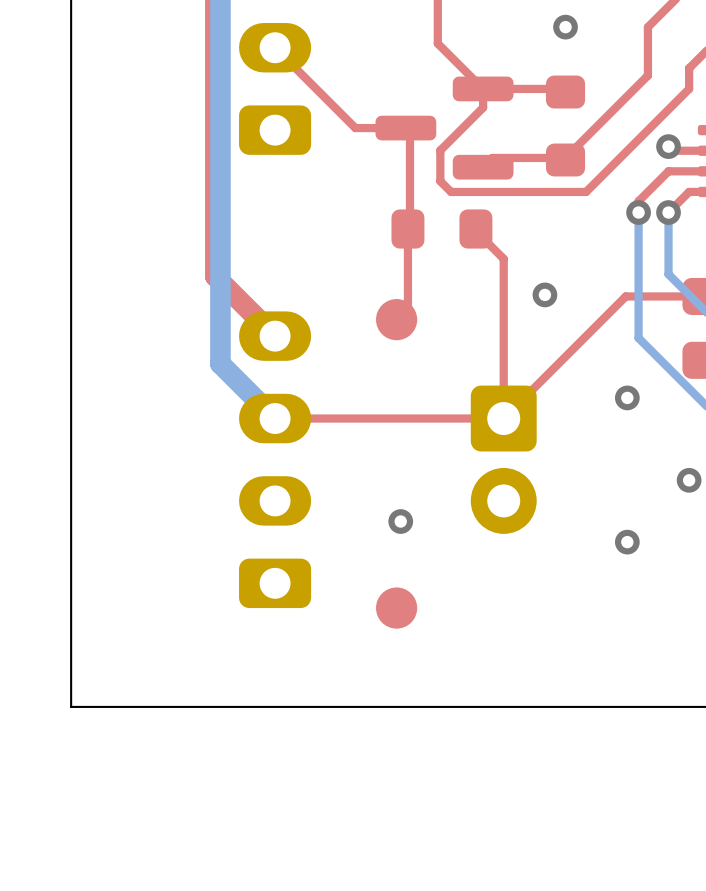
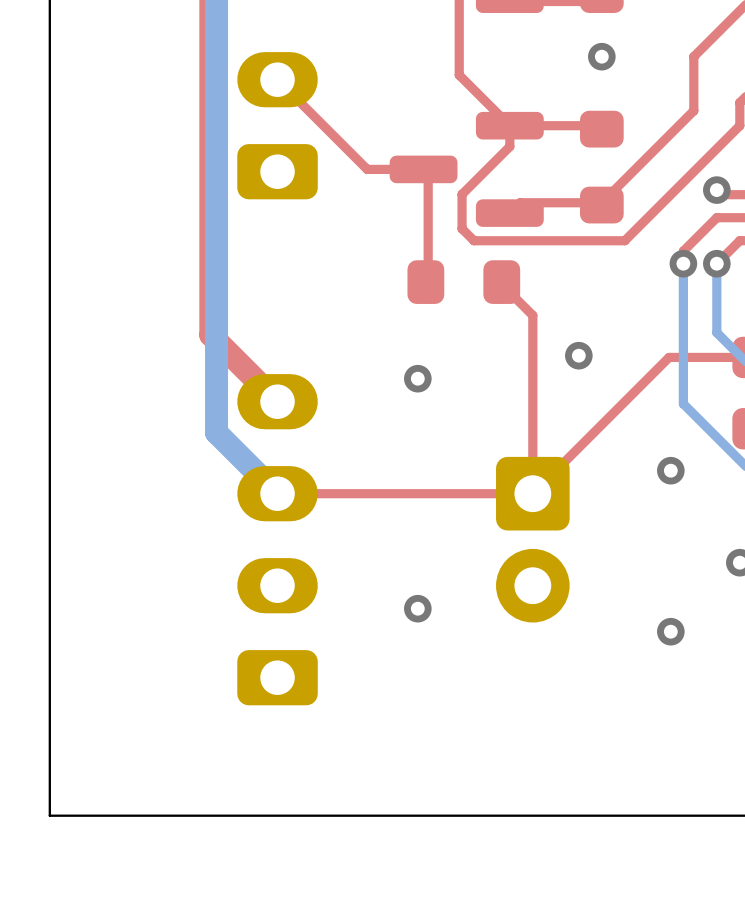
top track: (407, 229) (407, 308) (396, 319) -> none
via: none -> (417, 378)
part: (396, 319) -> none
part: (396, 608) -> none

